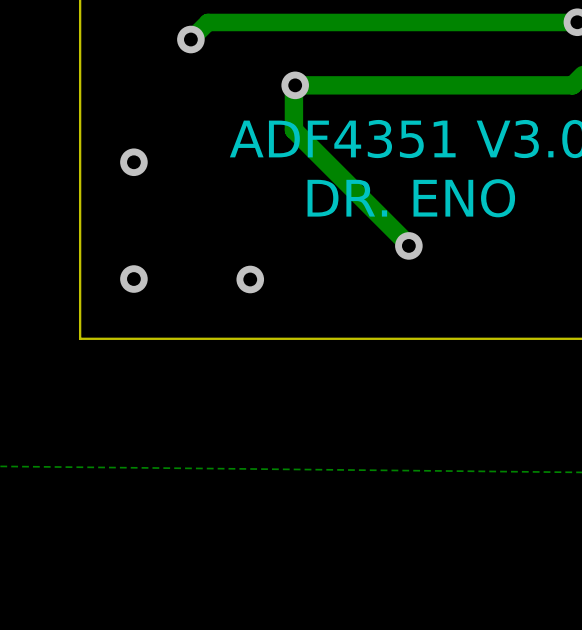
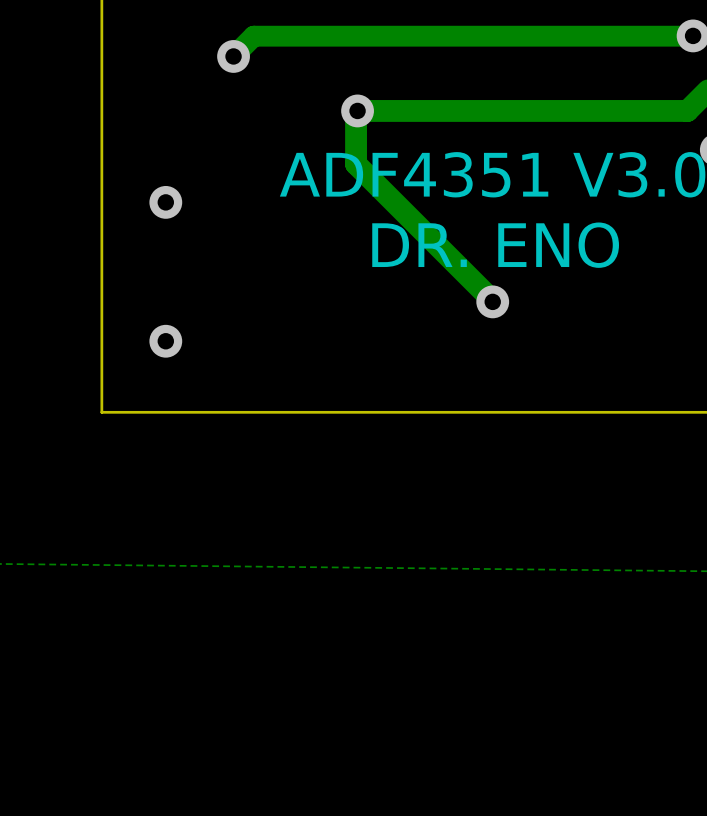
via: (250, 279) -> none

